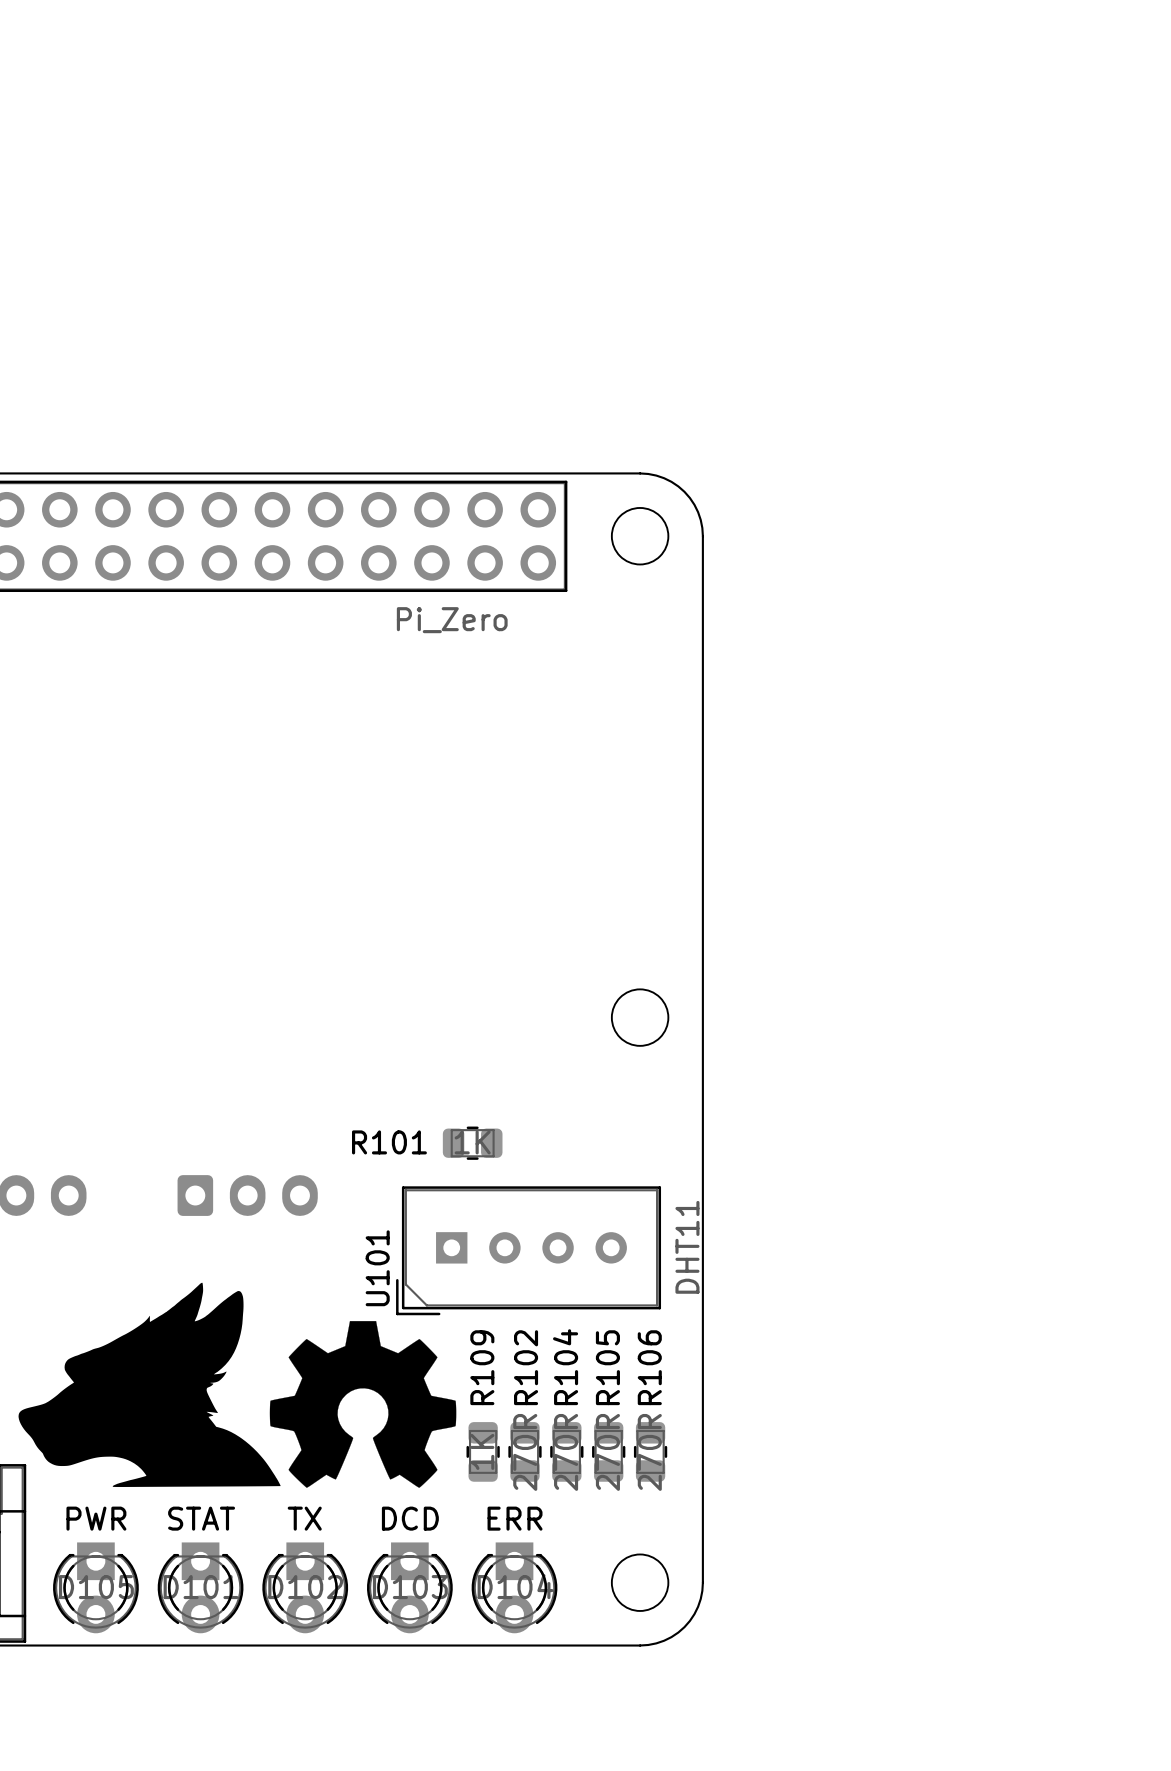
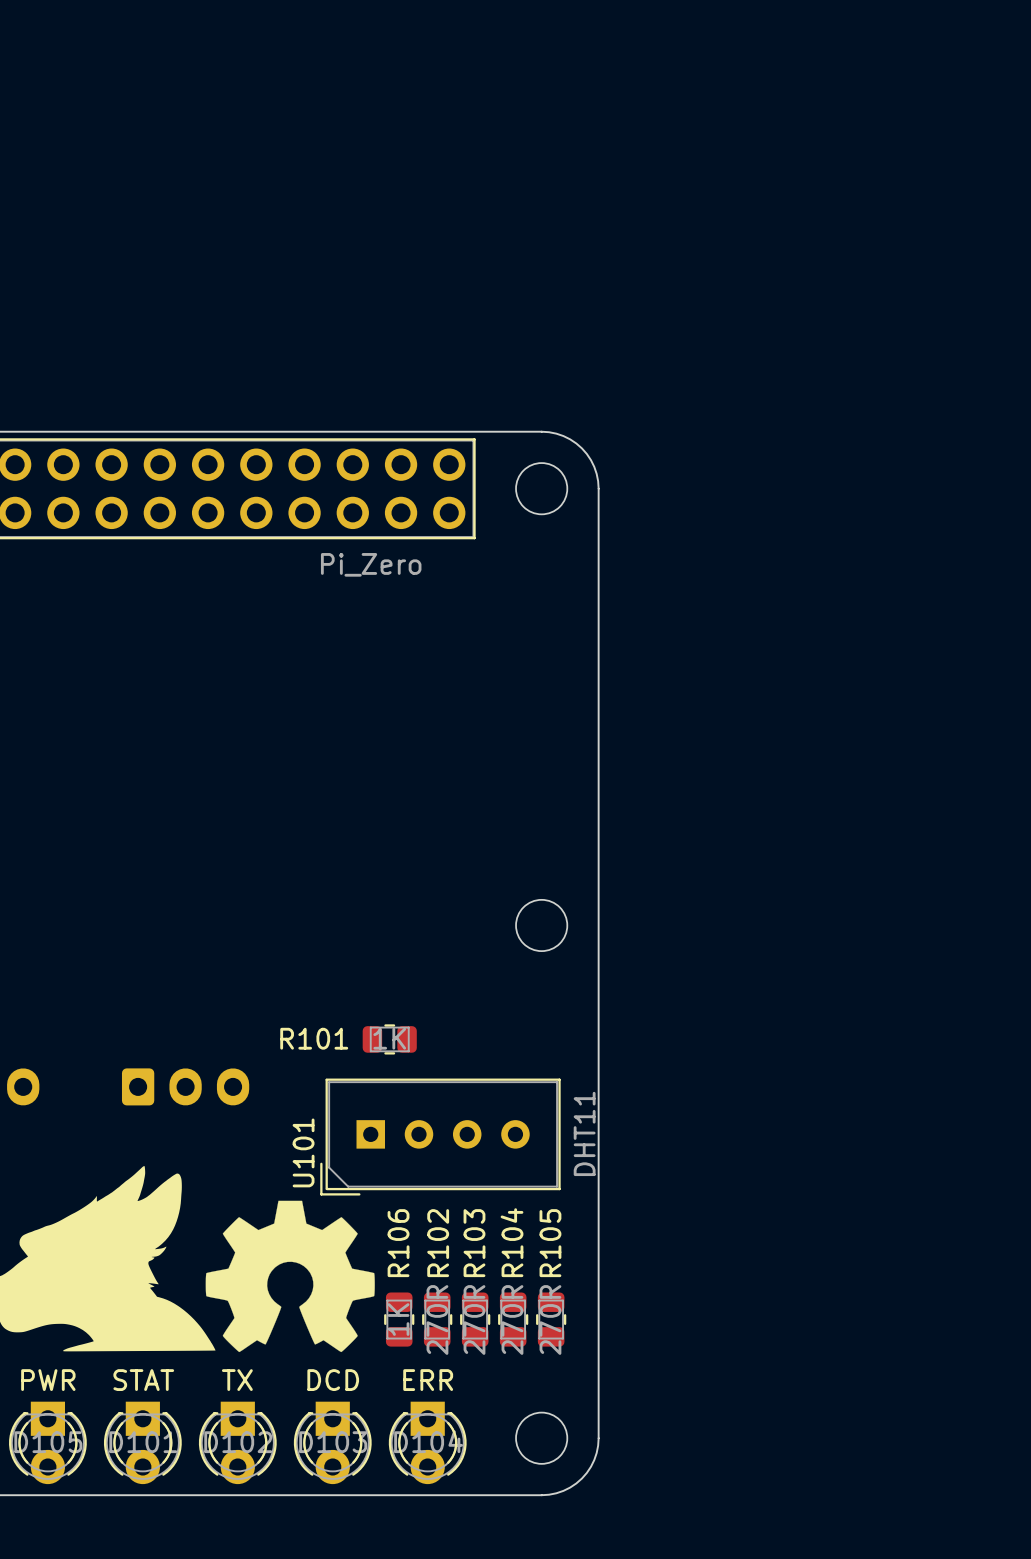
R109 name: R109 (482, 1367) -> R106 (398, 1243)
R104 name: R104 (565, 1367) -> R103 (474, 1243)
R105 name: R105 (607, 1367) -> R104 (512, 1242)
R106 name: R106 (649, 1367) -> R105 (550, 1243)

